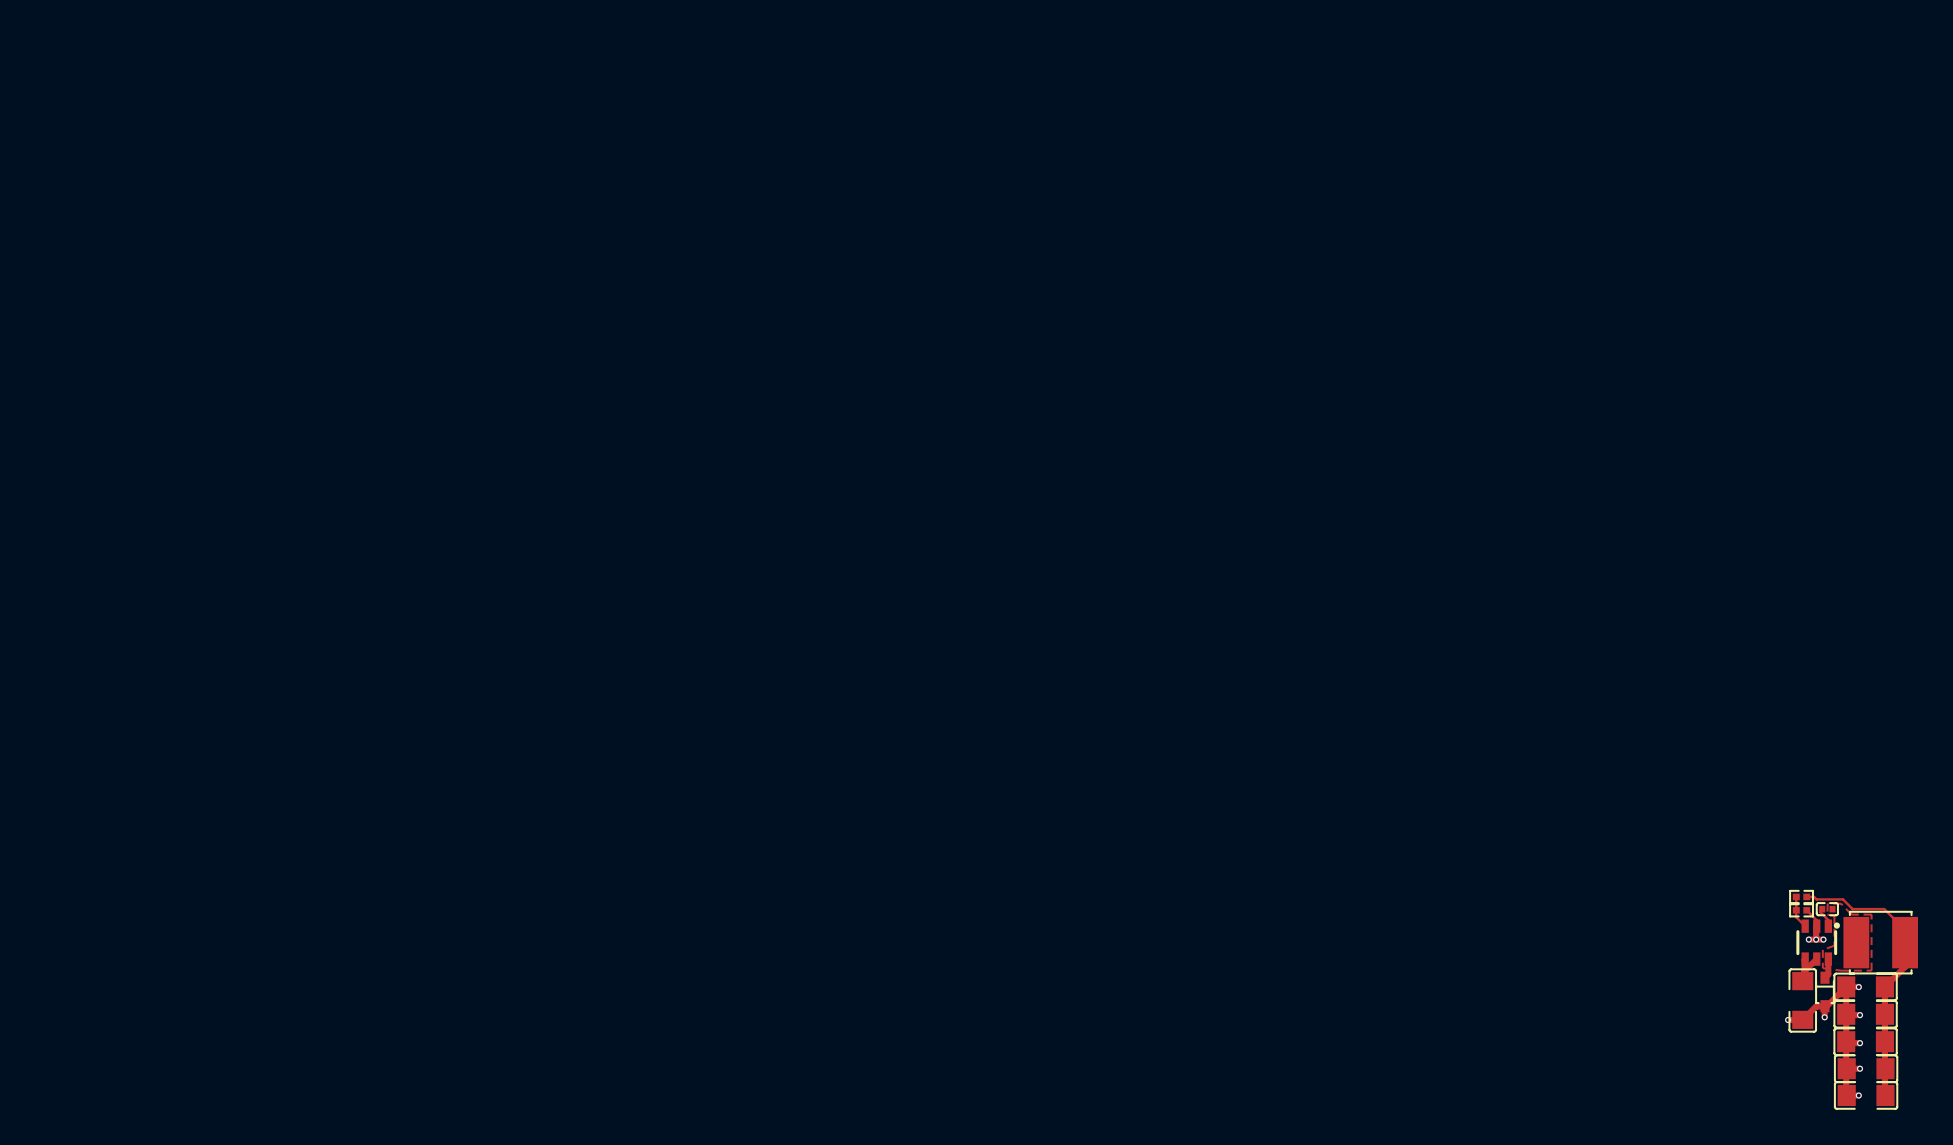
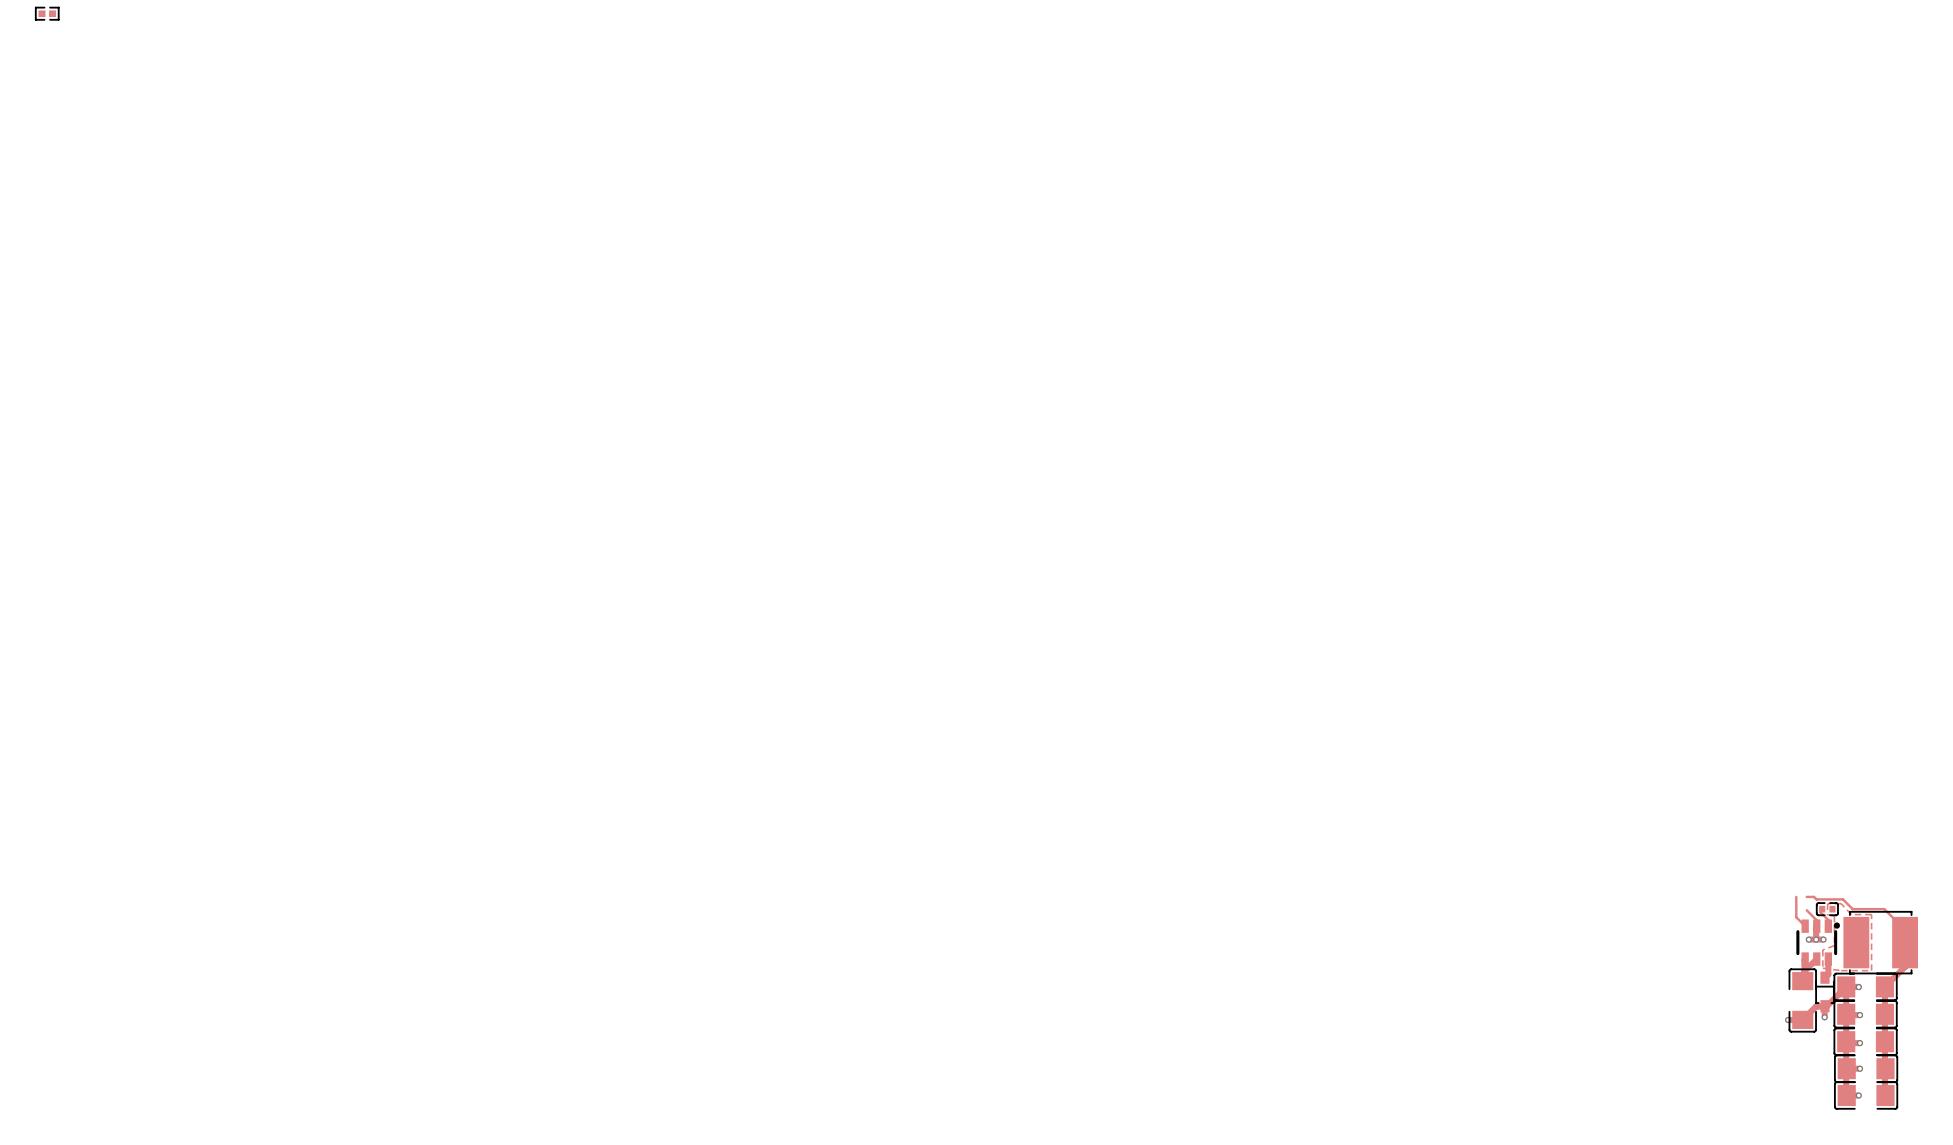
part: none -> (47, 13)
part: (1801, 896) -> none
part: (1801, 910) -> none

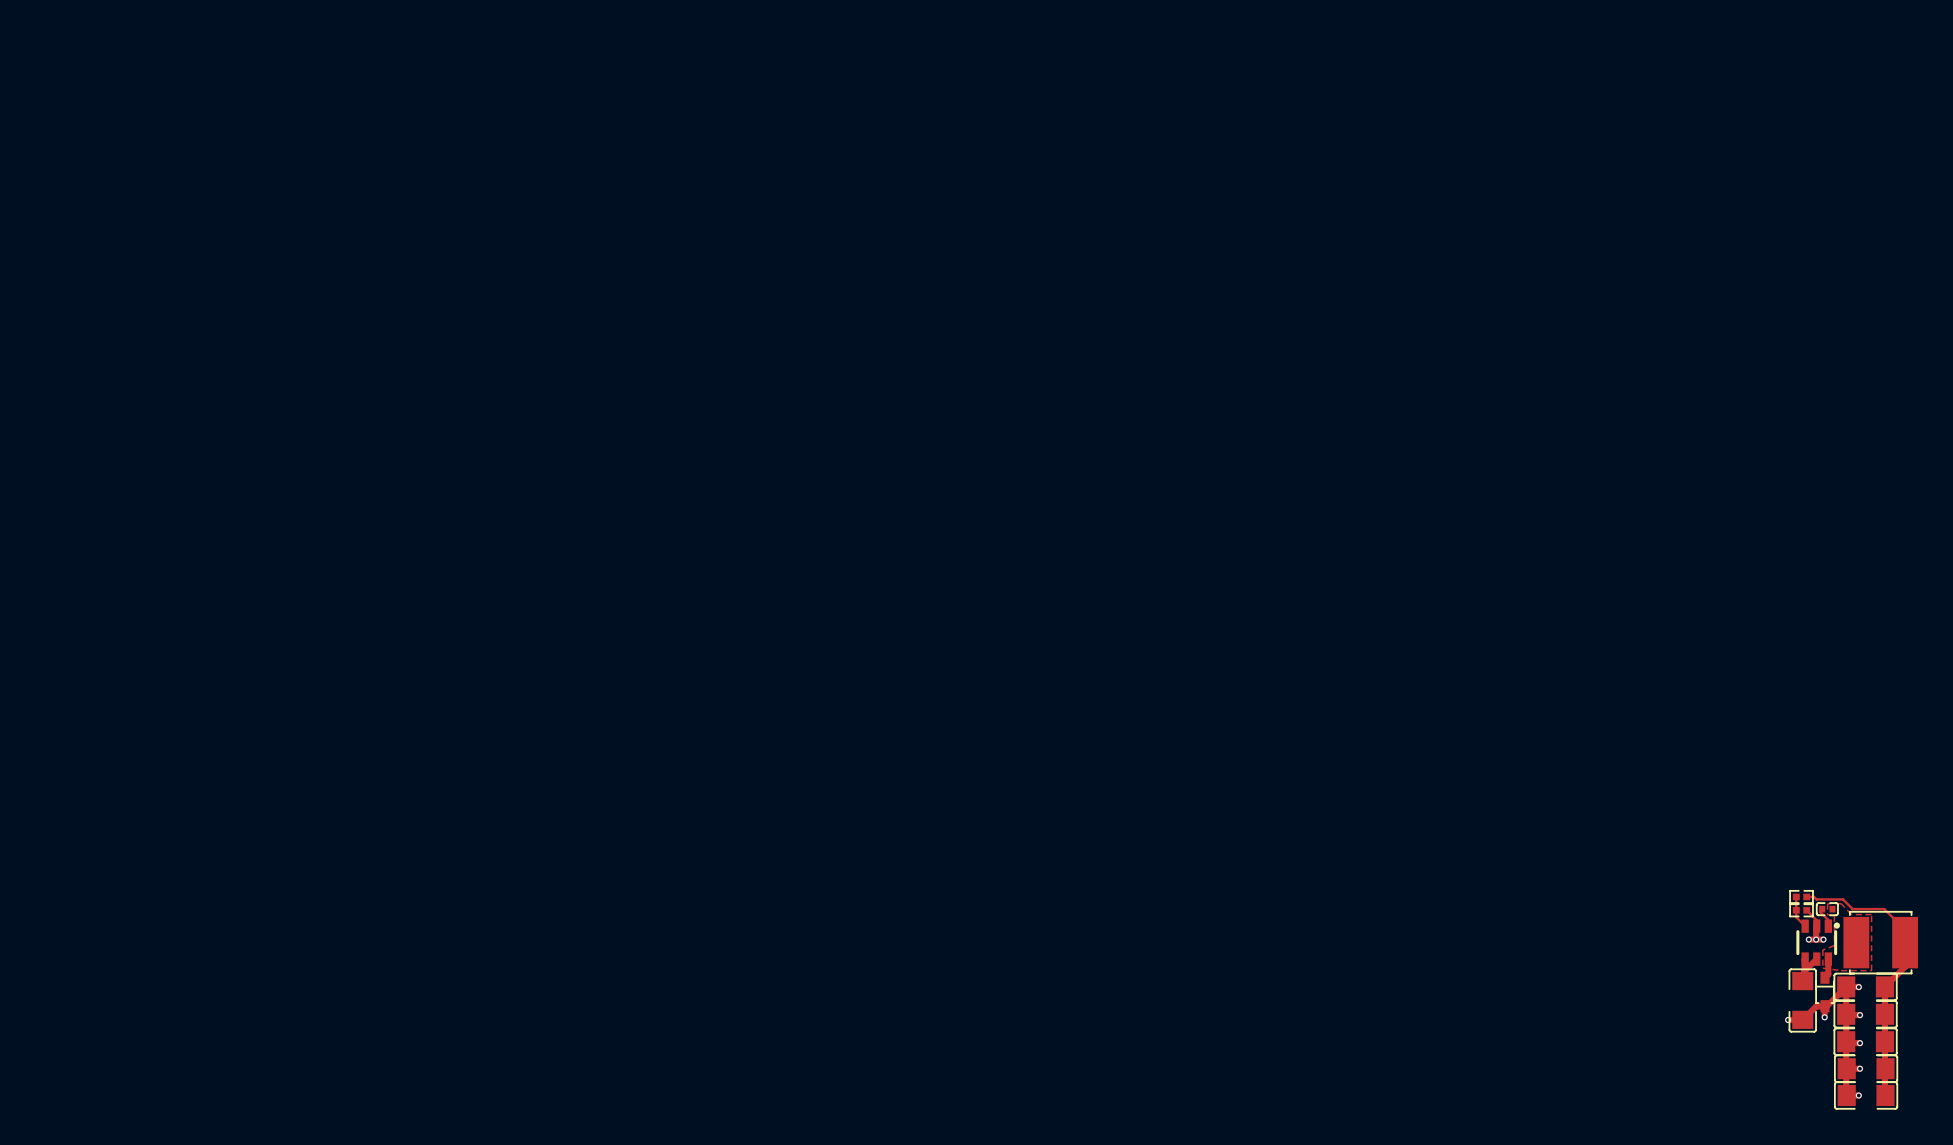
part: (47, 13) -> none
part: none -> (1801, 896)
part: none -> (1801, 910)

